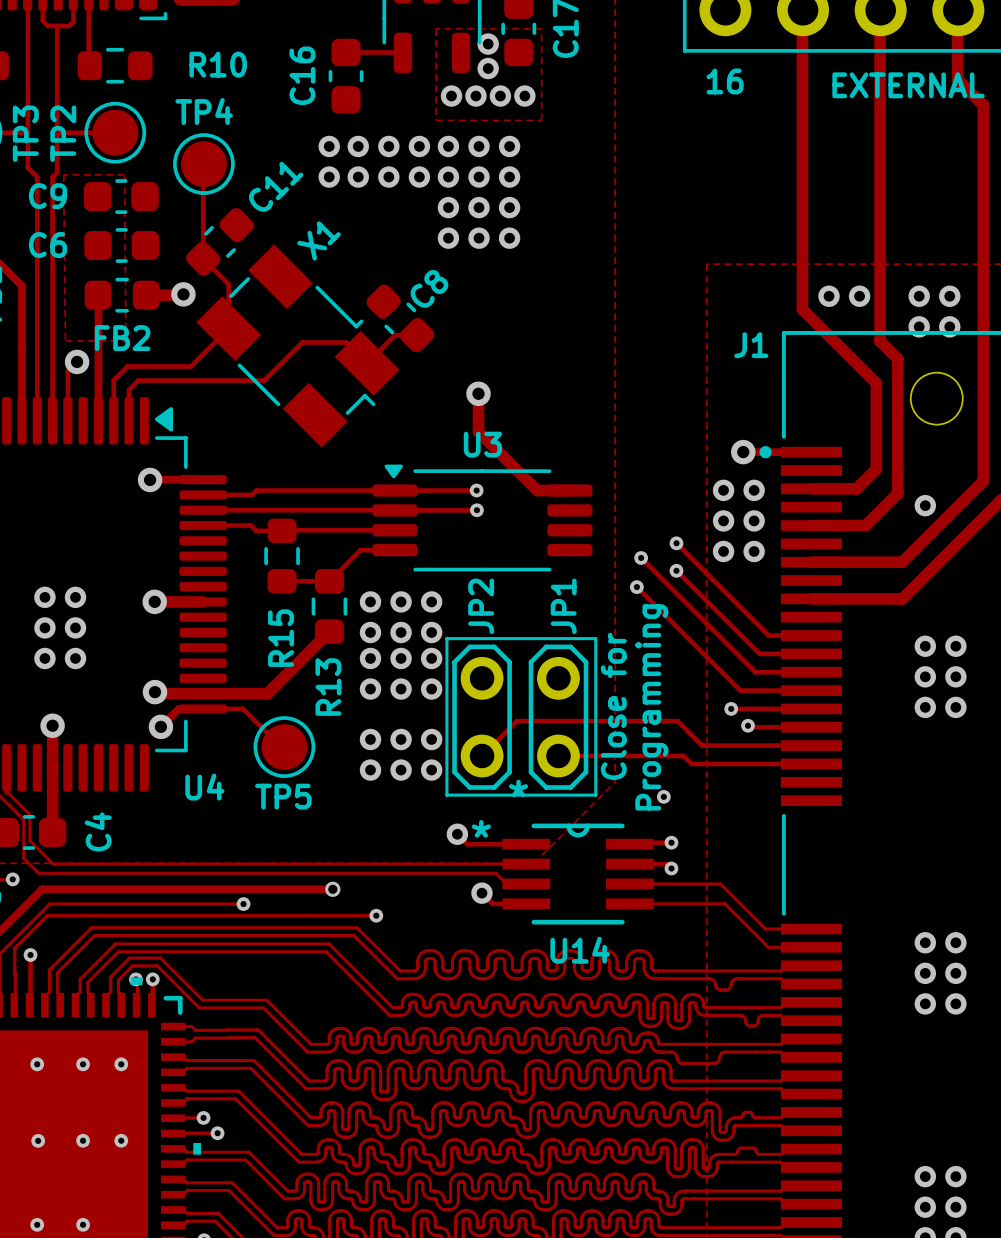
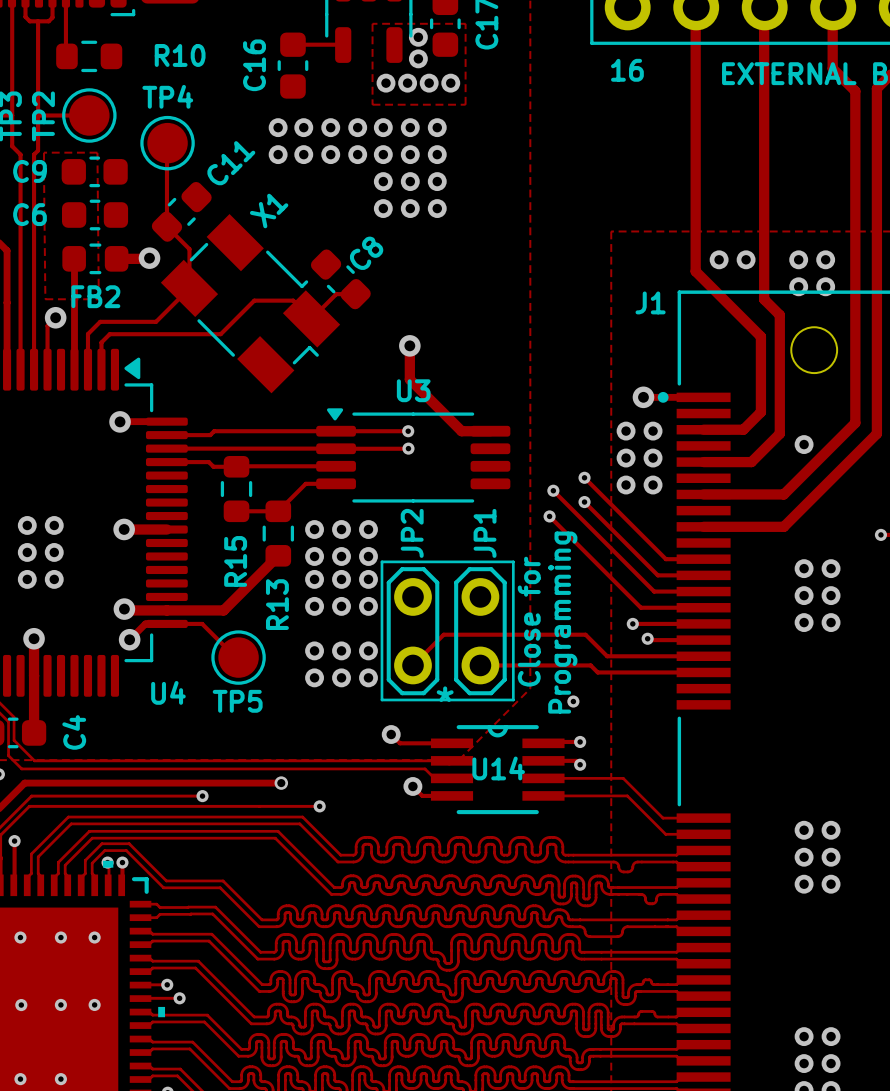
U14 text: * (481, 828) -> none
U14 name position: U14 (580, 950) -> U14 (498, 768)

